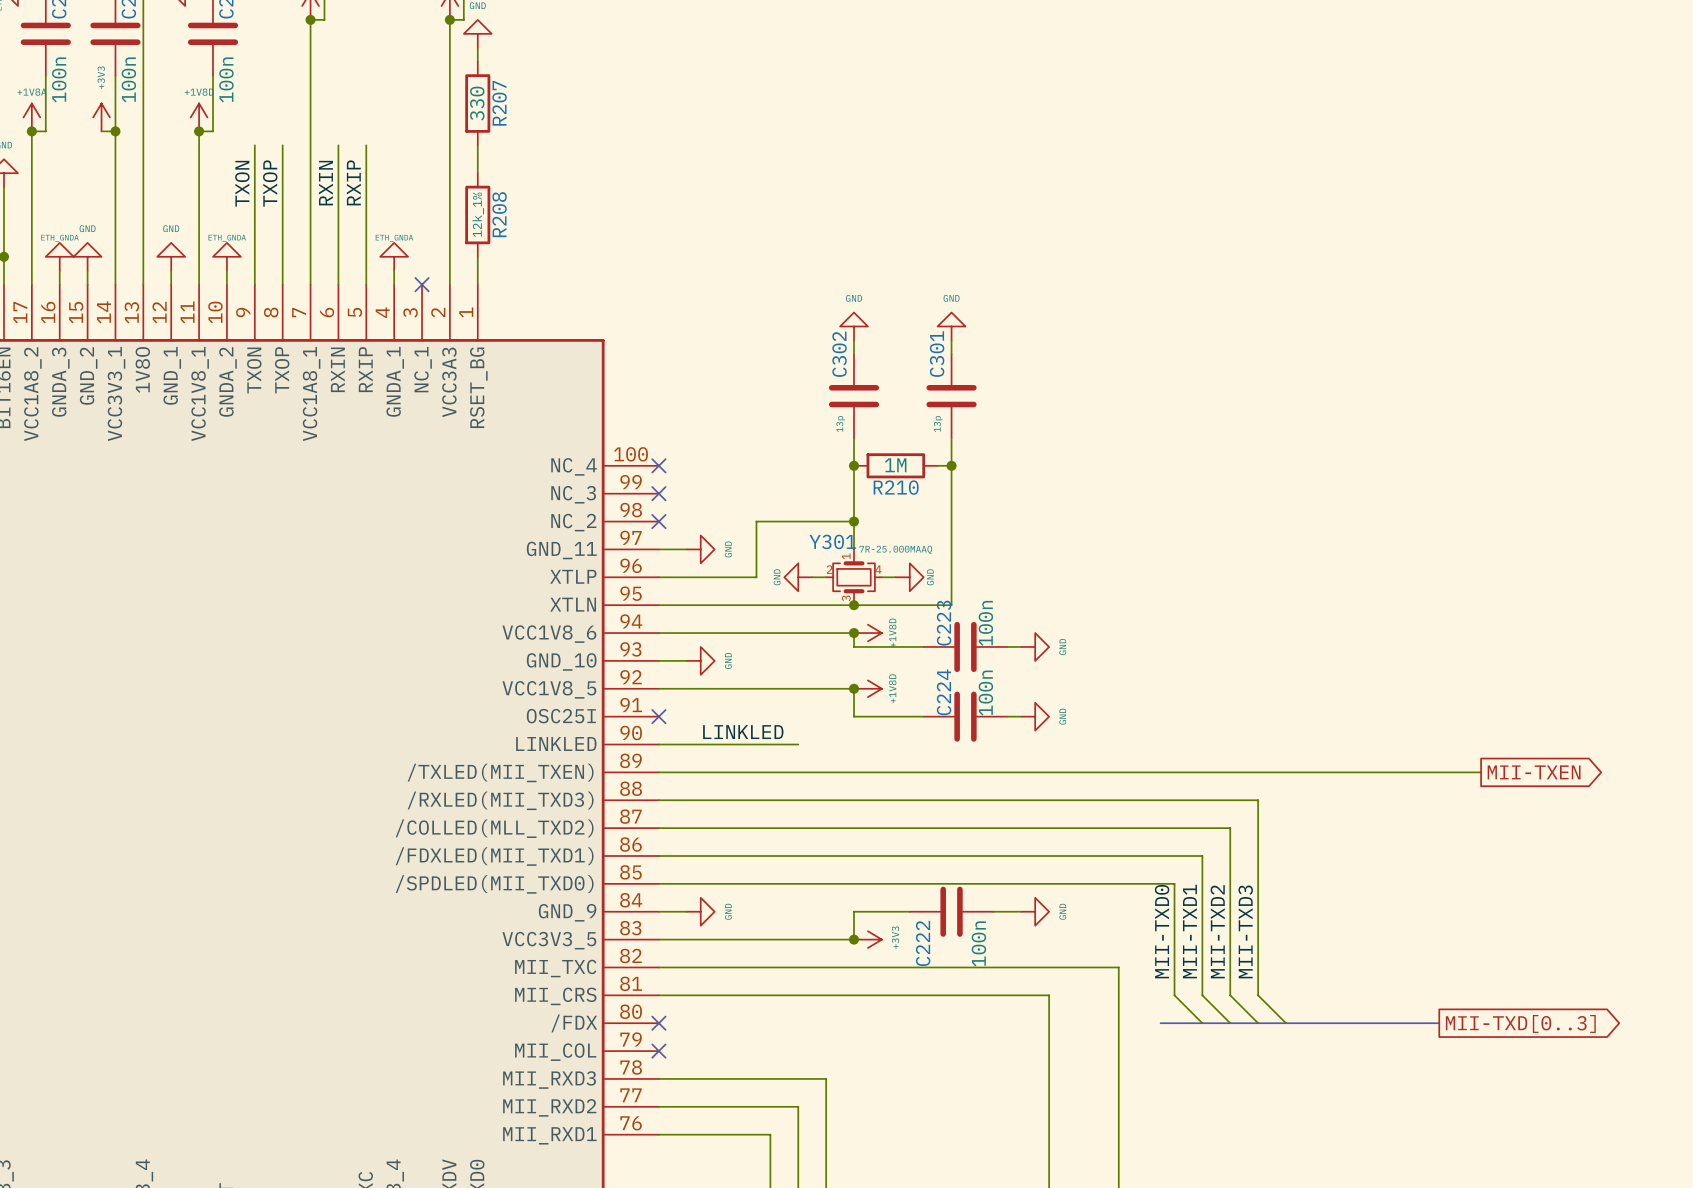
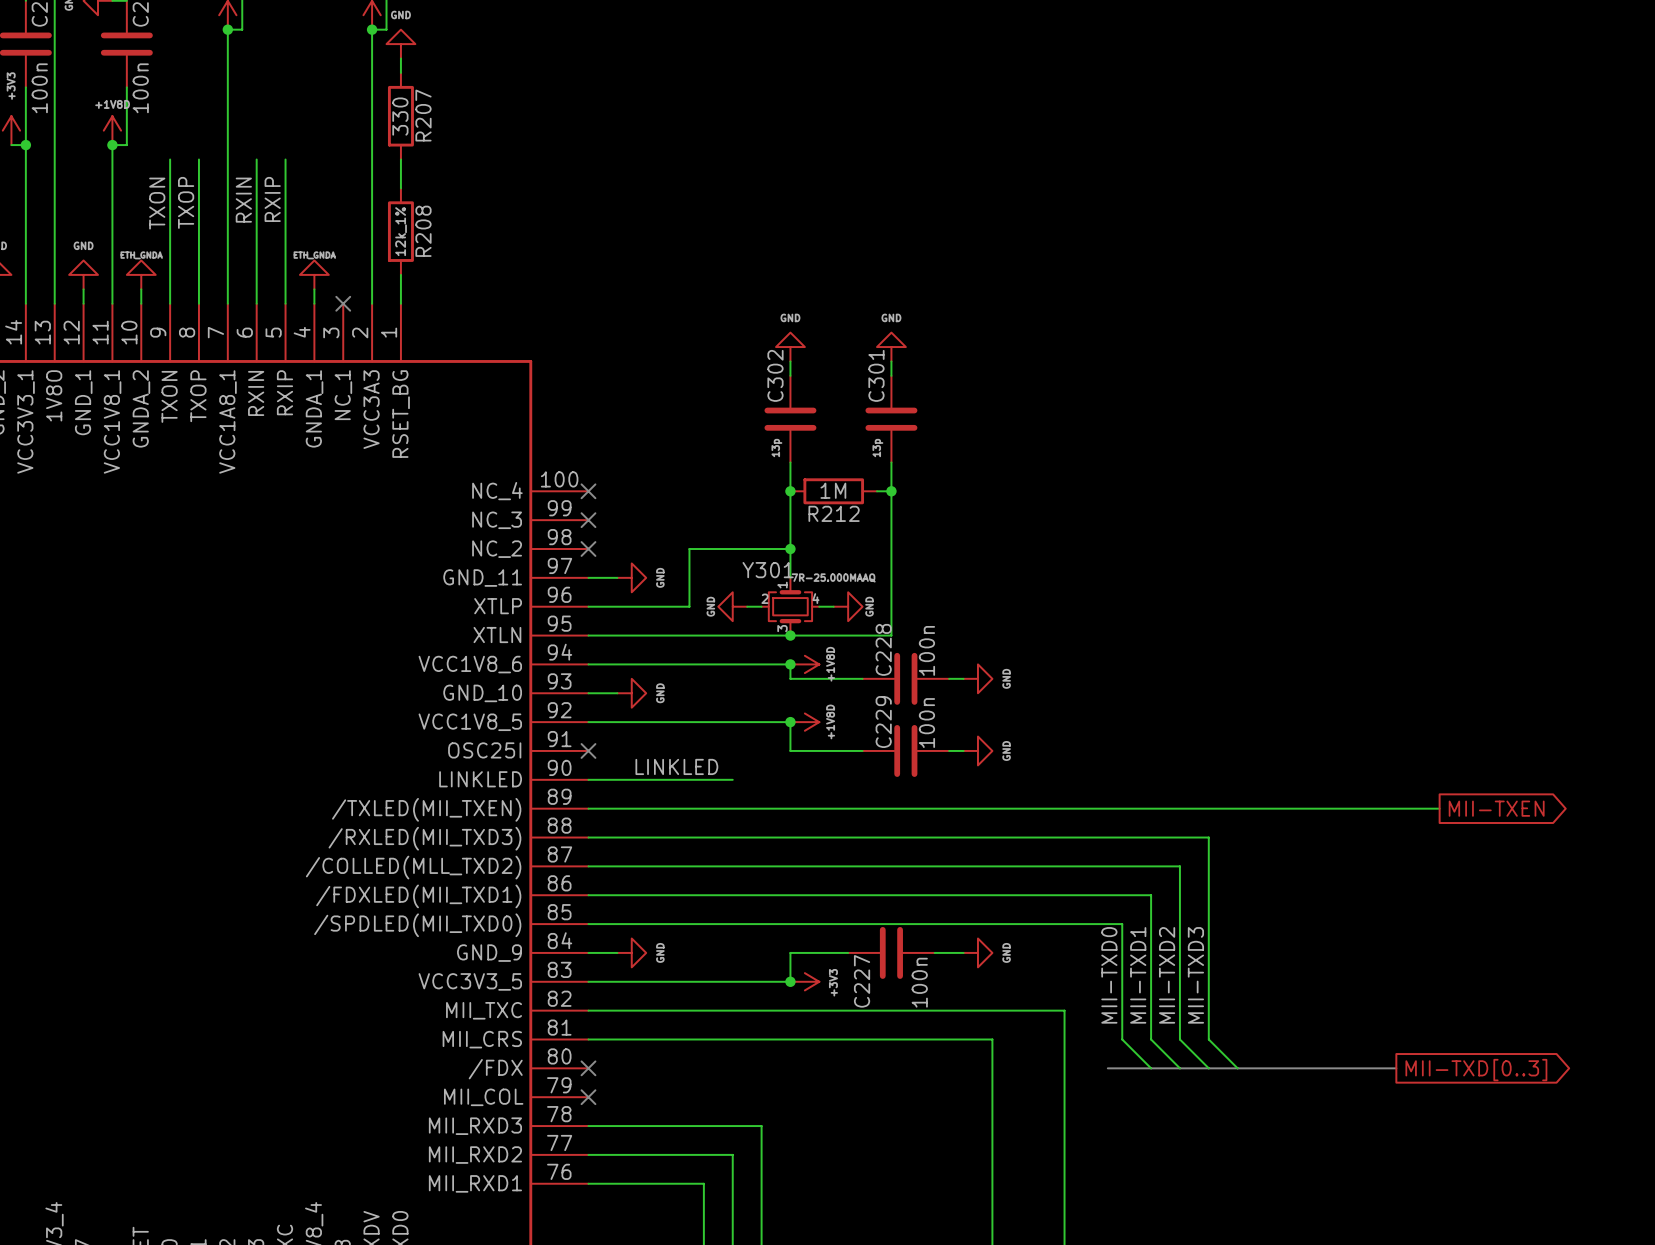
R210 name: R210 (896, 487) -> R212 (834, 513)
C223 name: C223 (944, 623) -> C228 (883, 649)
C224 name: C224 (944, 692) -> C229 (883, 722)
C222 name: C222 (923, 943) -> C227 (862, 981)

